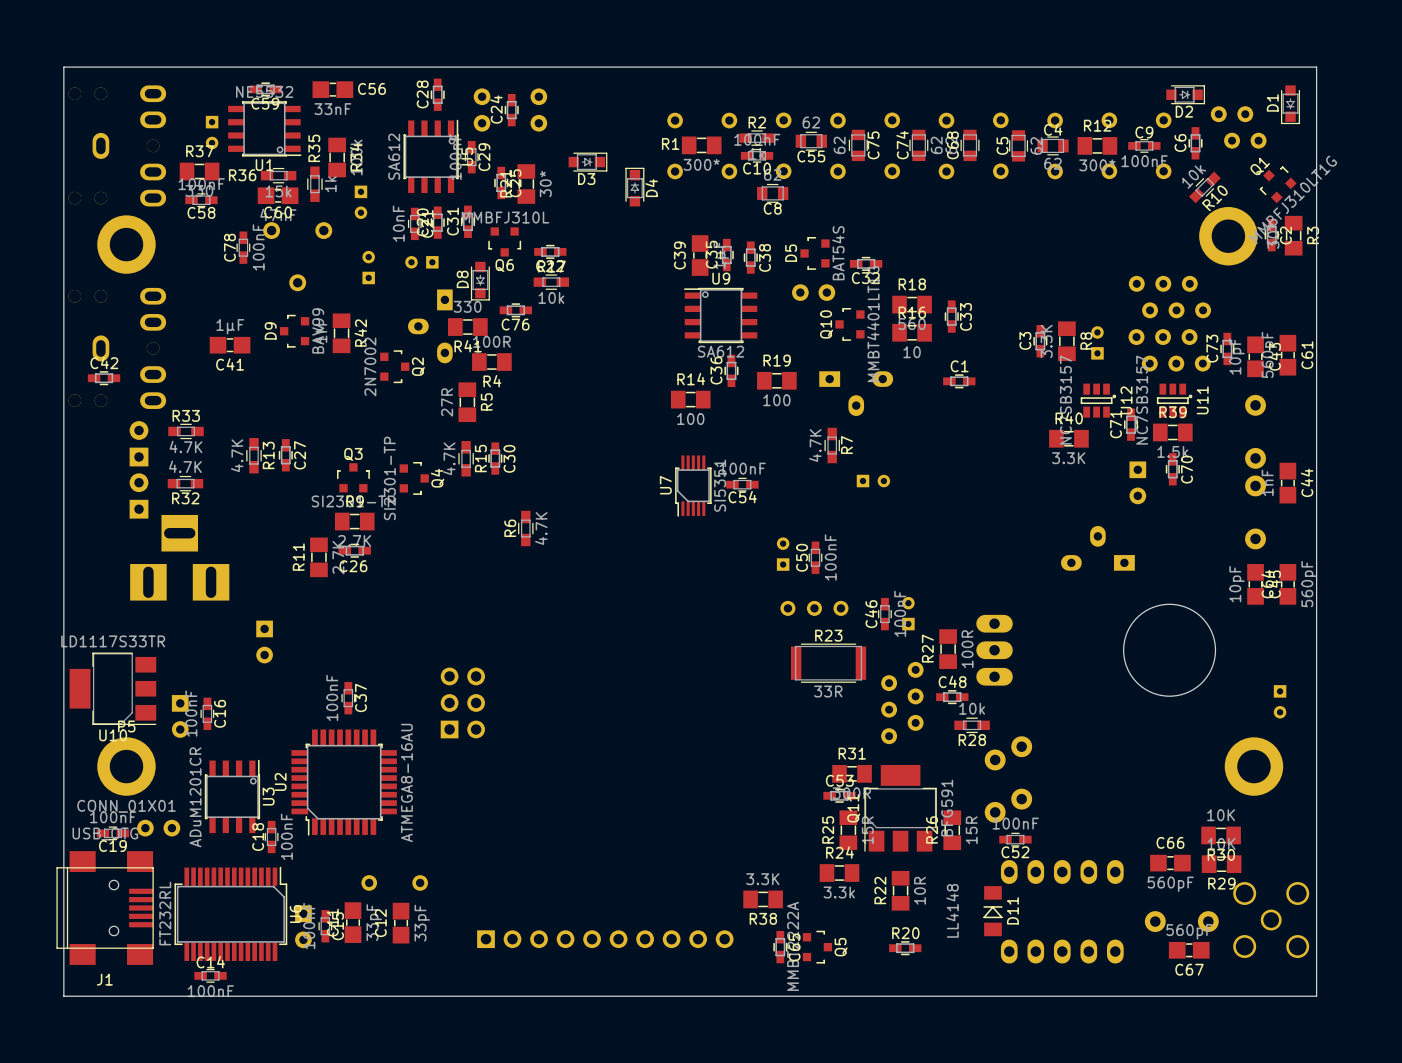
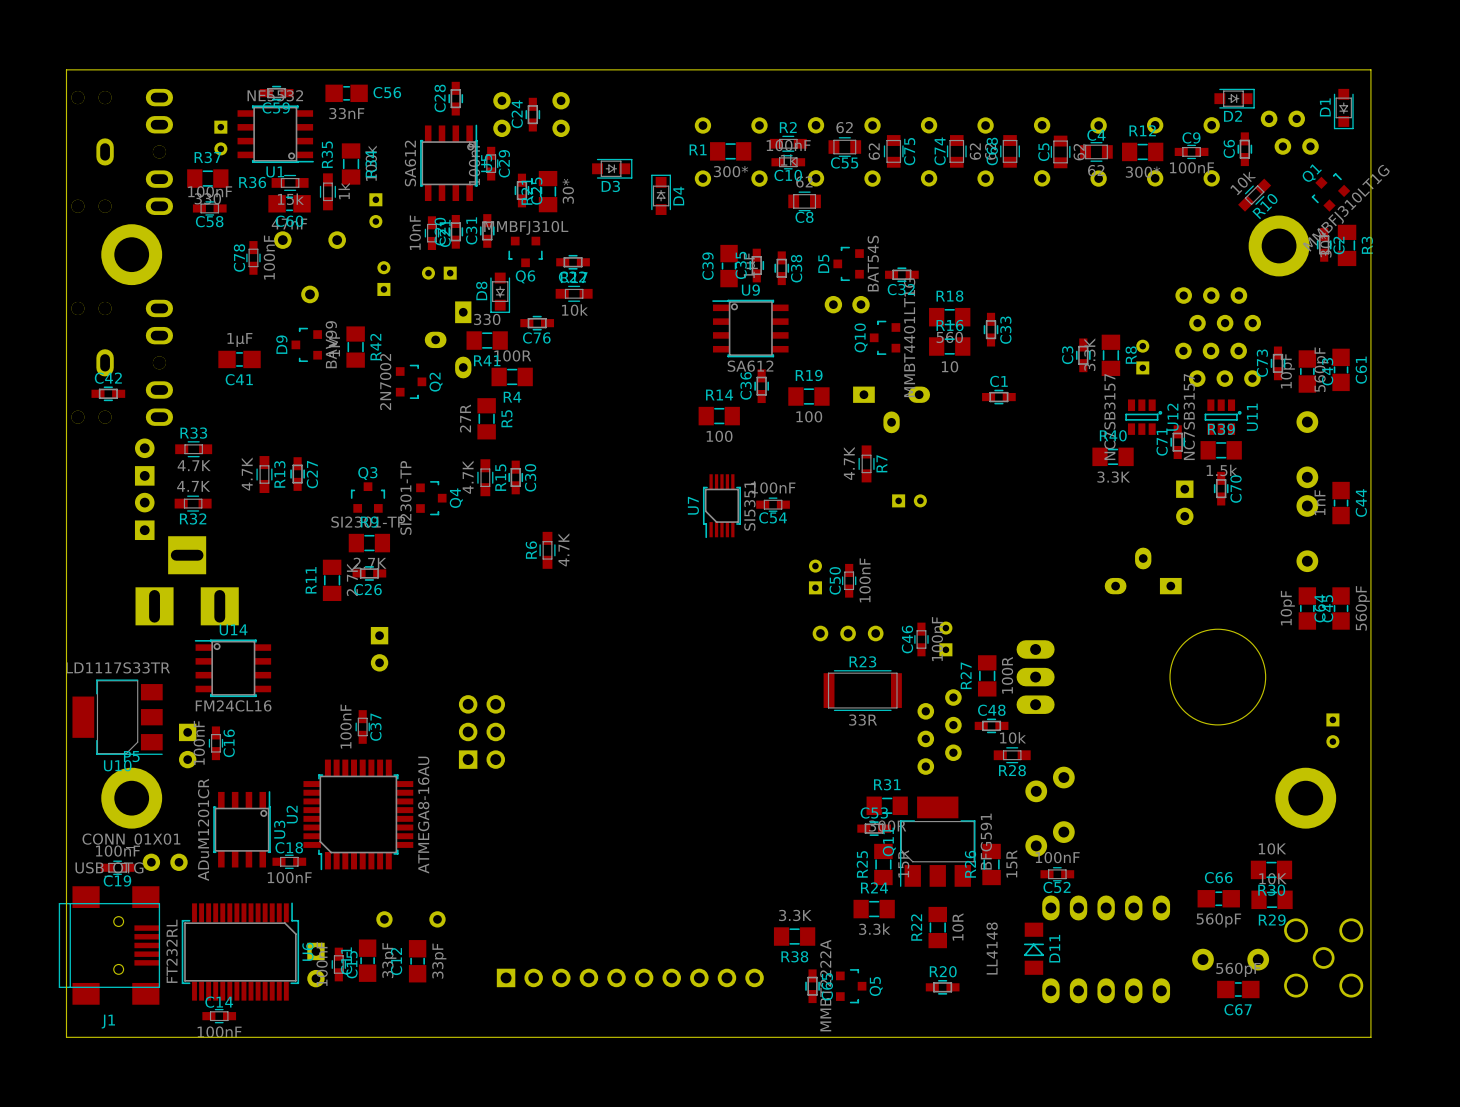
U14: none -> FM24CL16 (232, 668)
part position: (264, 641) -> (379, 649)
C18 rotation: 0° (271, 837) -> 90° clockwise (289, 861)

